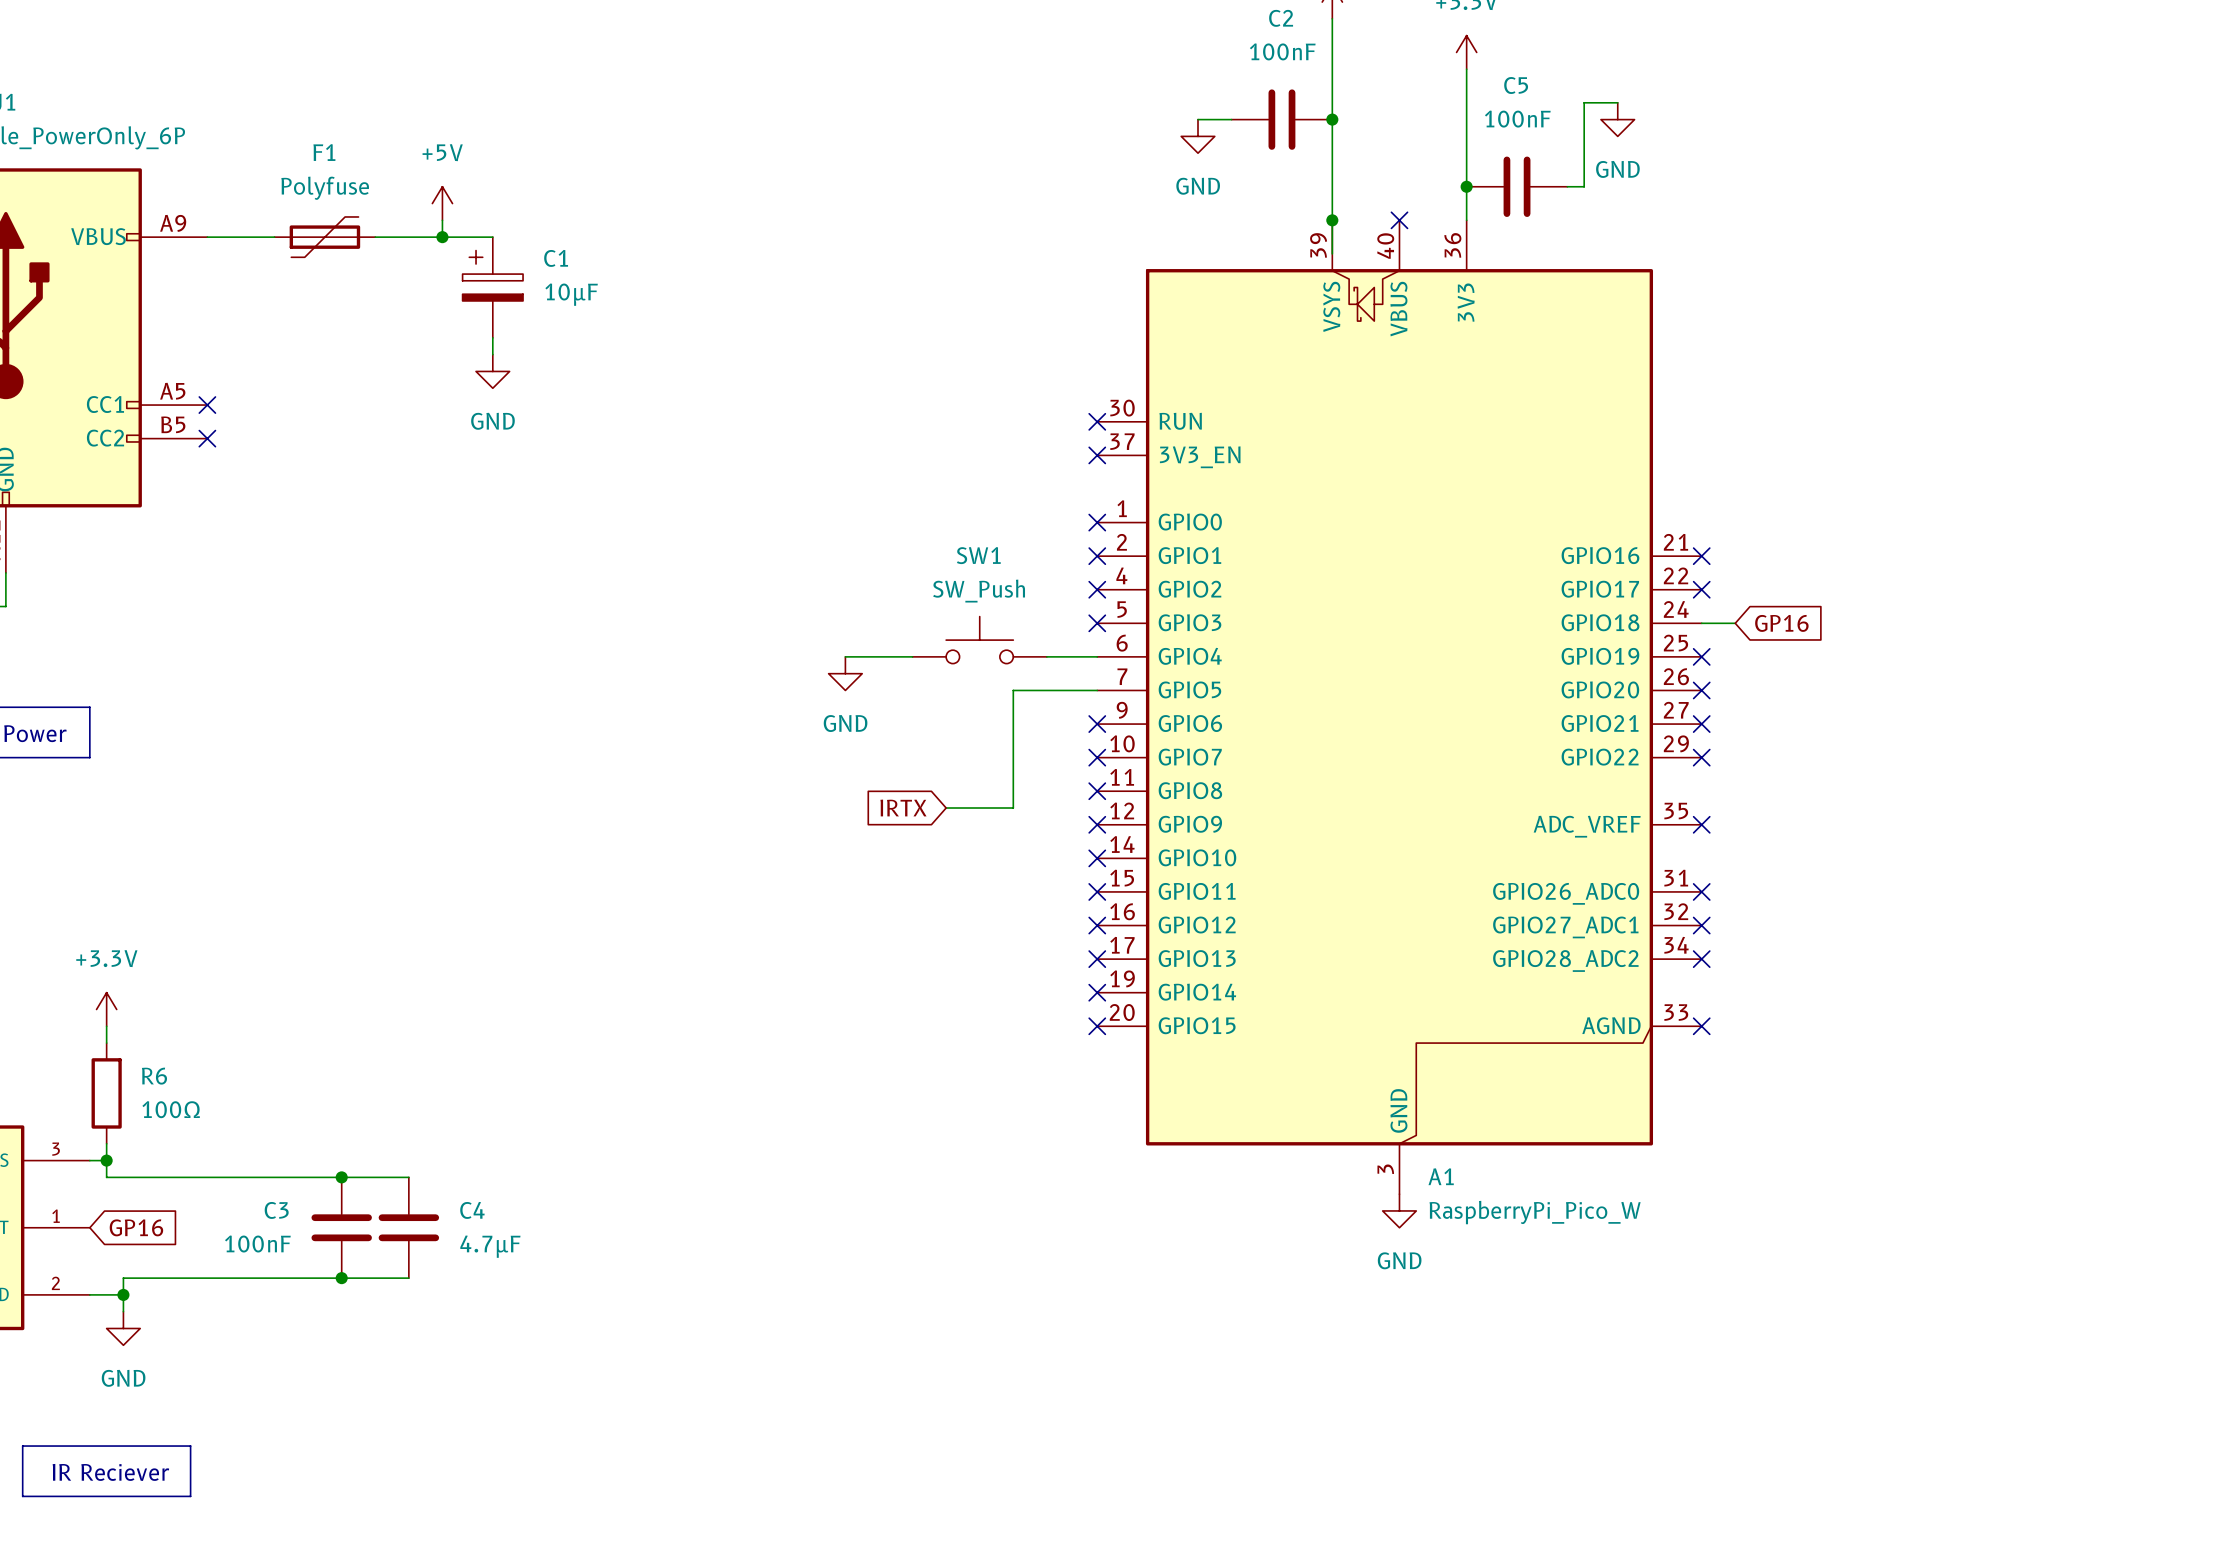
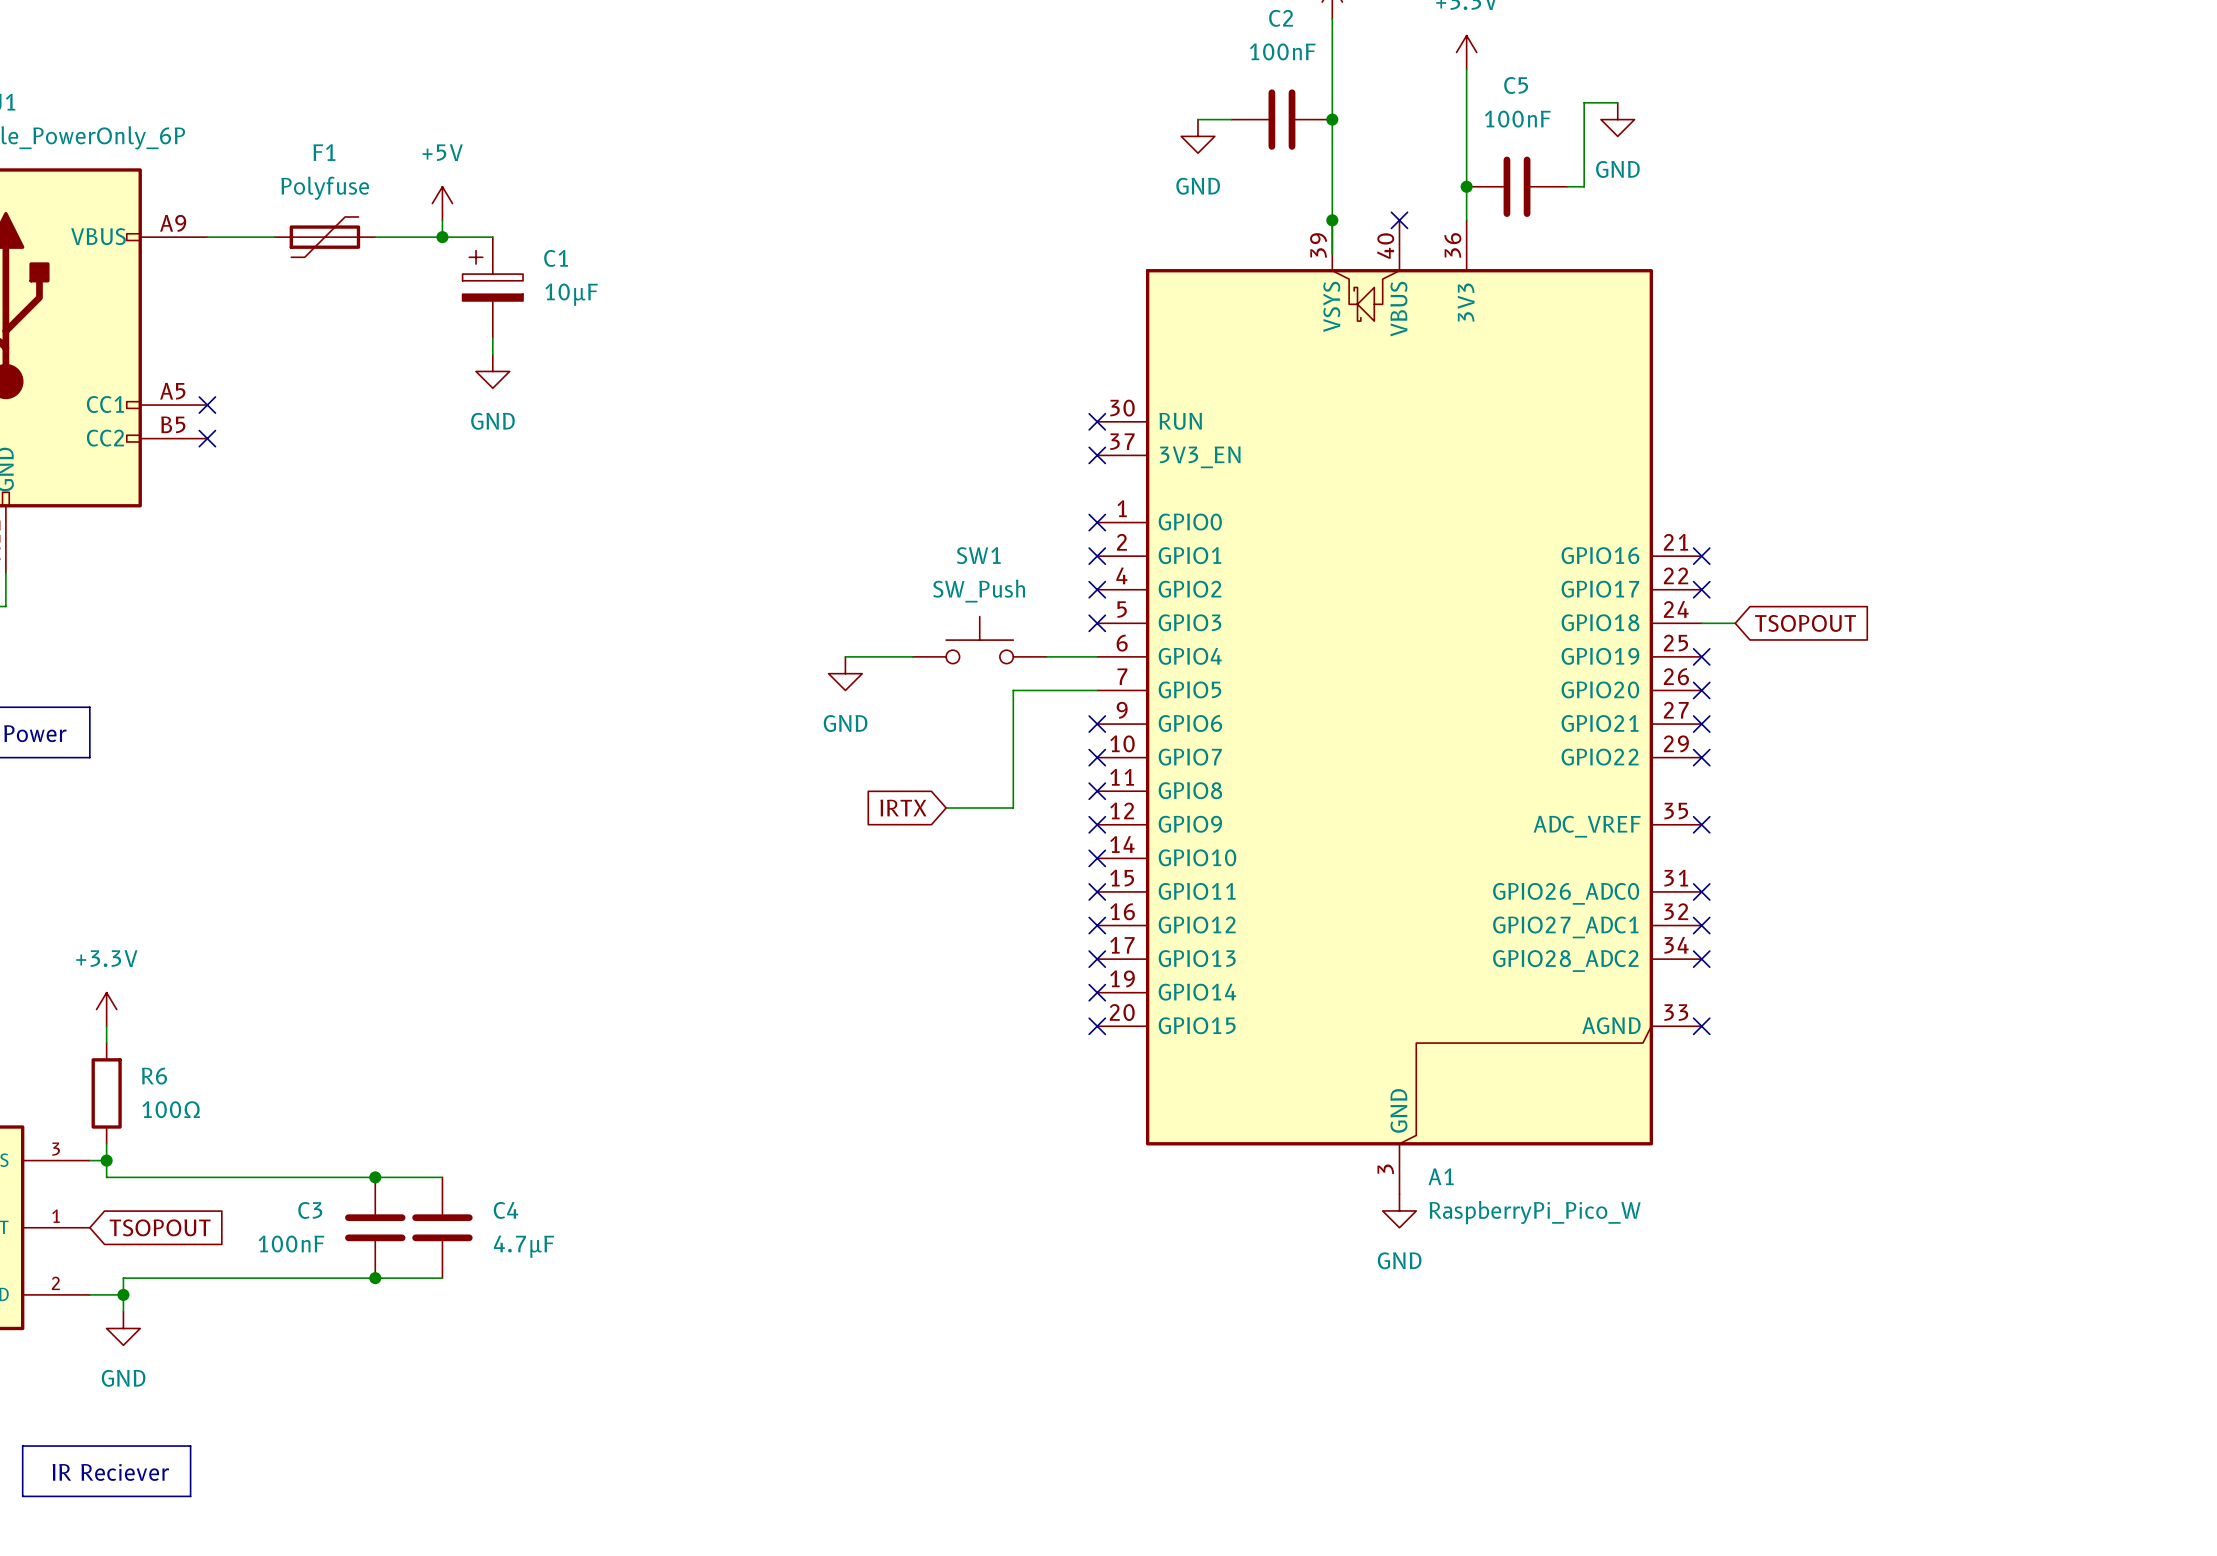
global label: GP16 (1781, 623) -> TSOPOUT (1805, 623)
junction position: (341, 1177) -> (375, 1177)
wire: none -> (408, 1177) (442, 1177)
global label: GP16 (136, 1227) -> TSOPOUT (160, 1227)
C3 position: (341, 1227) -> (375, 1227)
C4 position: (408, 1227) -> (442, 1227)
junction position: (341, 1278) -> (375, 1278)
wire: none -> (408, 1278) (442, 1278)

